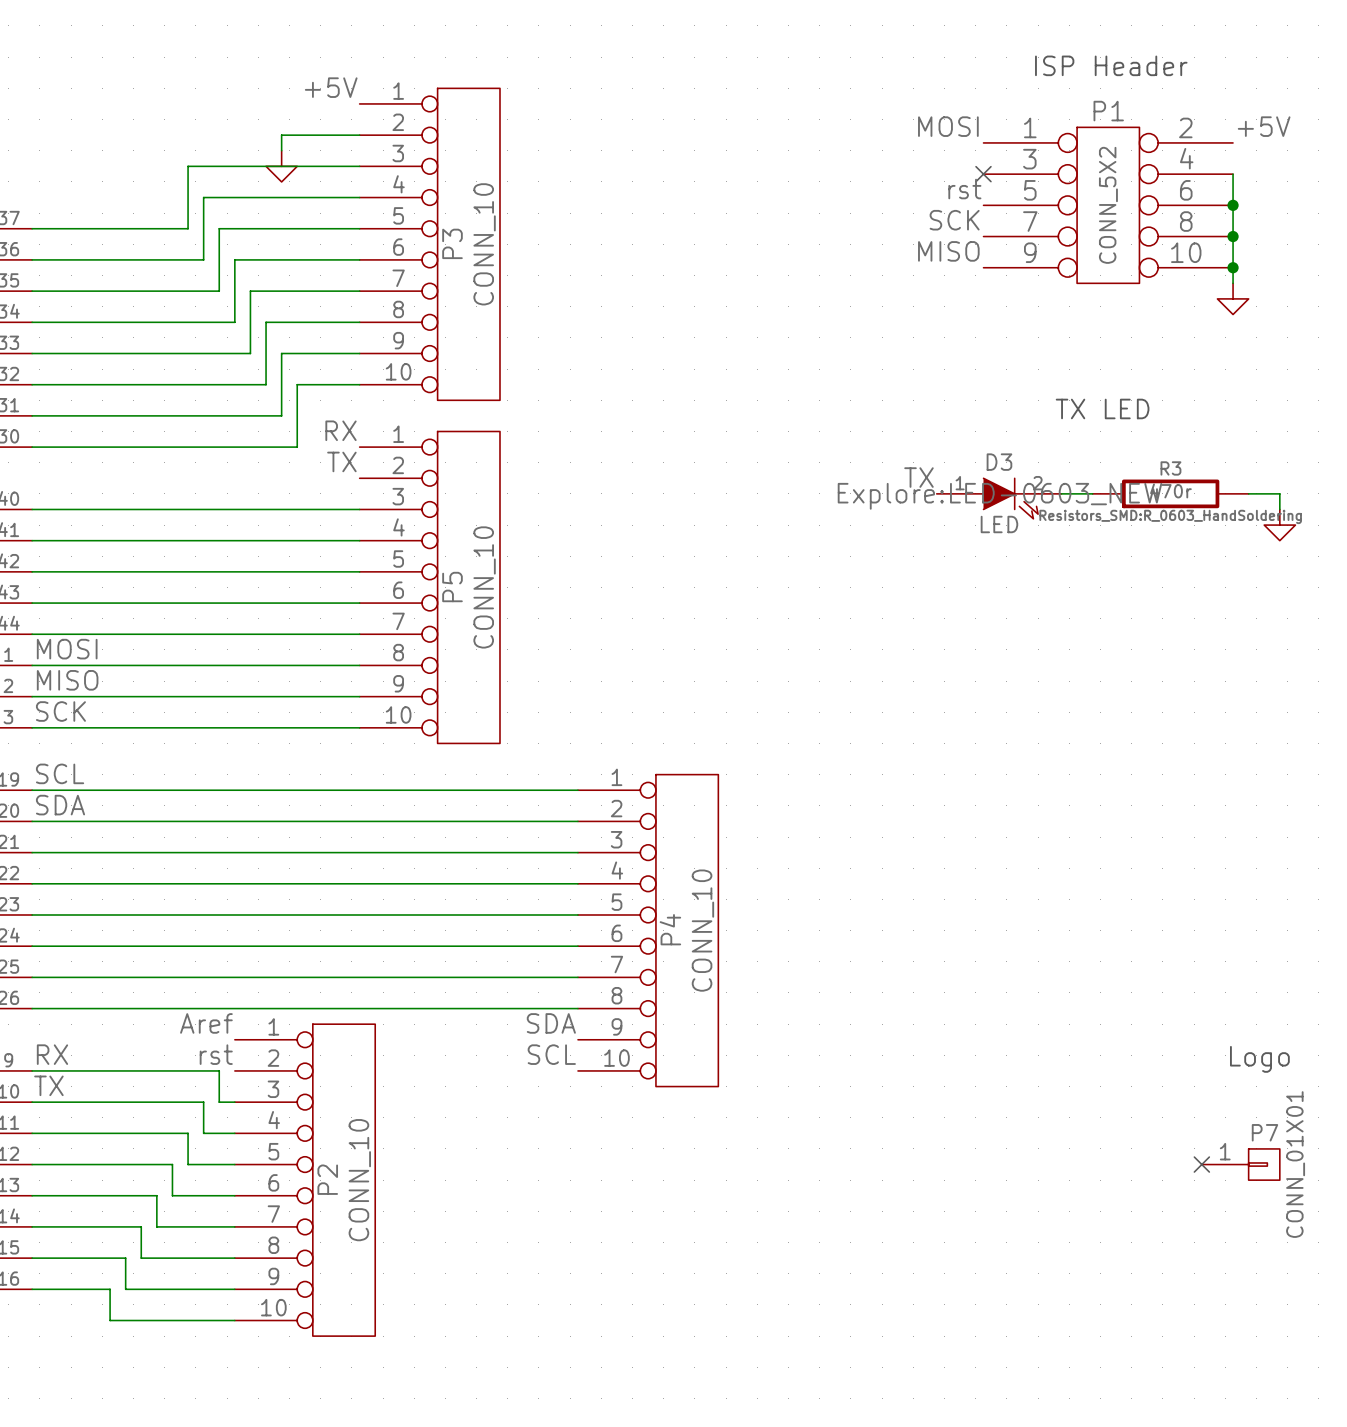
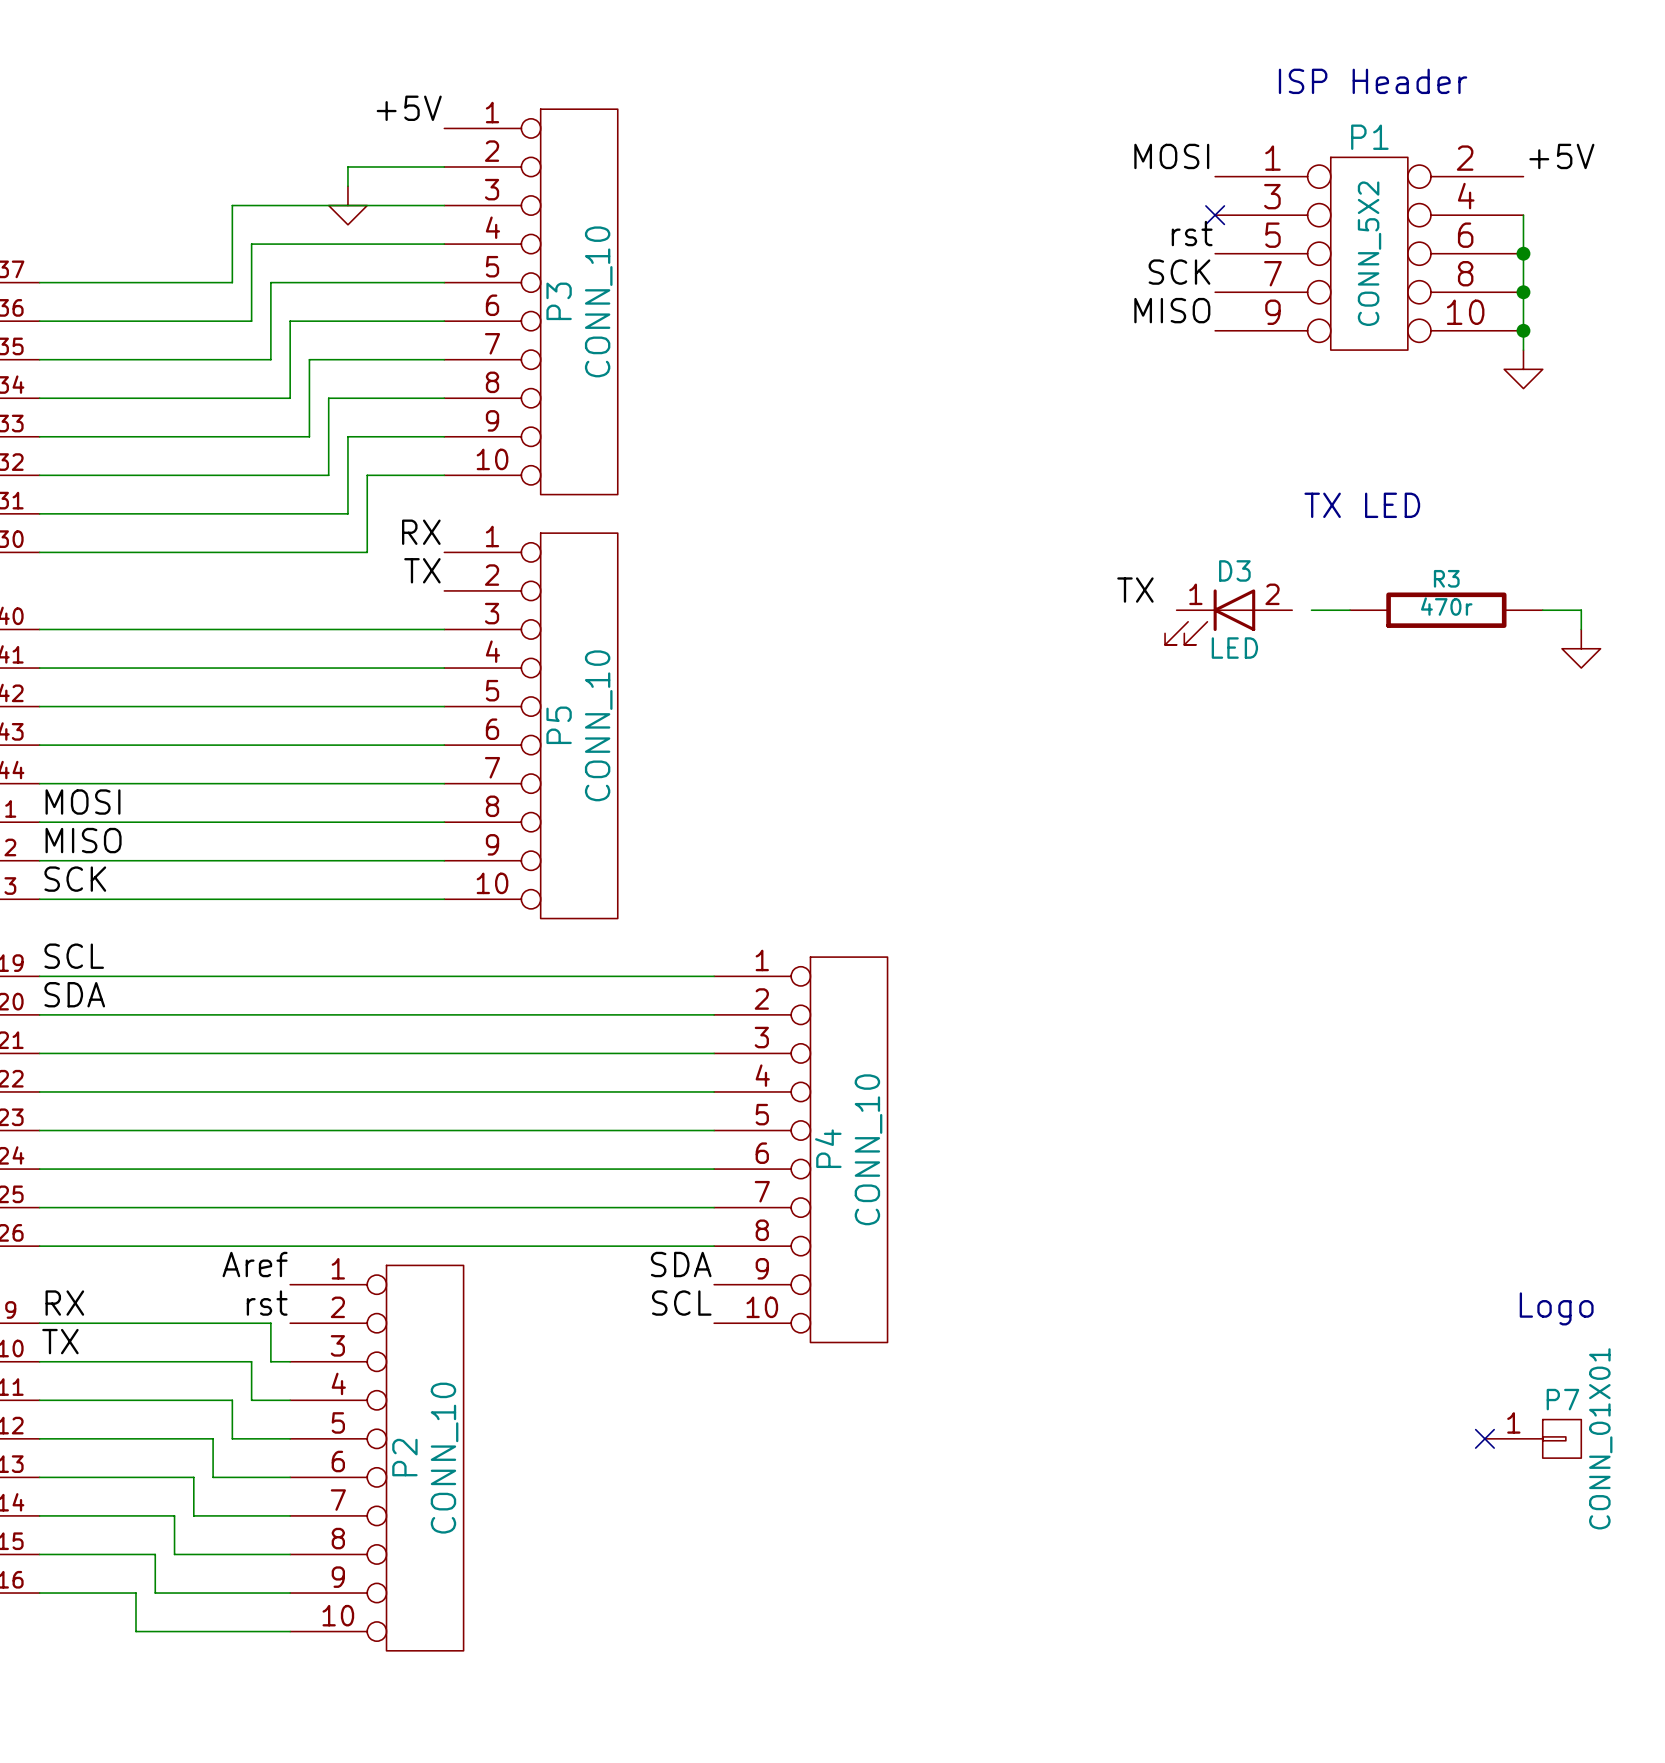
D3 symbol: [936, 478, 1062, 519] -> [1165, 589, 1293, 645]
D3 text: Explore:LED-0603_NEW (999, 496) -> none
R3 text: Resistors_SMD:R_0603_HandSoldering (1170, 516) -> none

